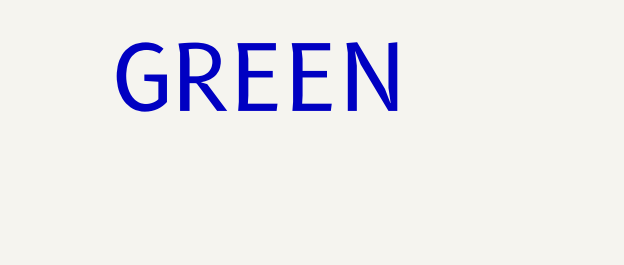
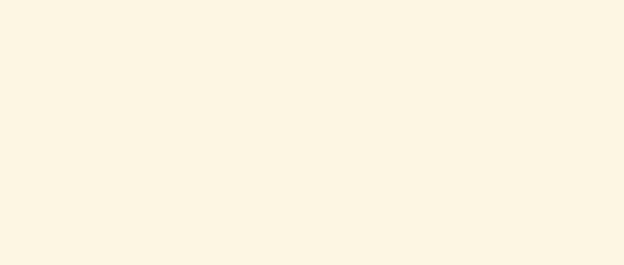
text: GREEN (256, 76) -> none

